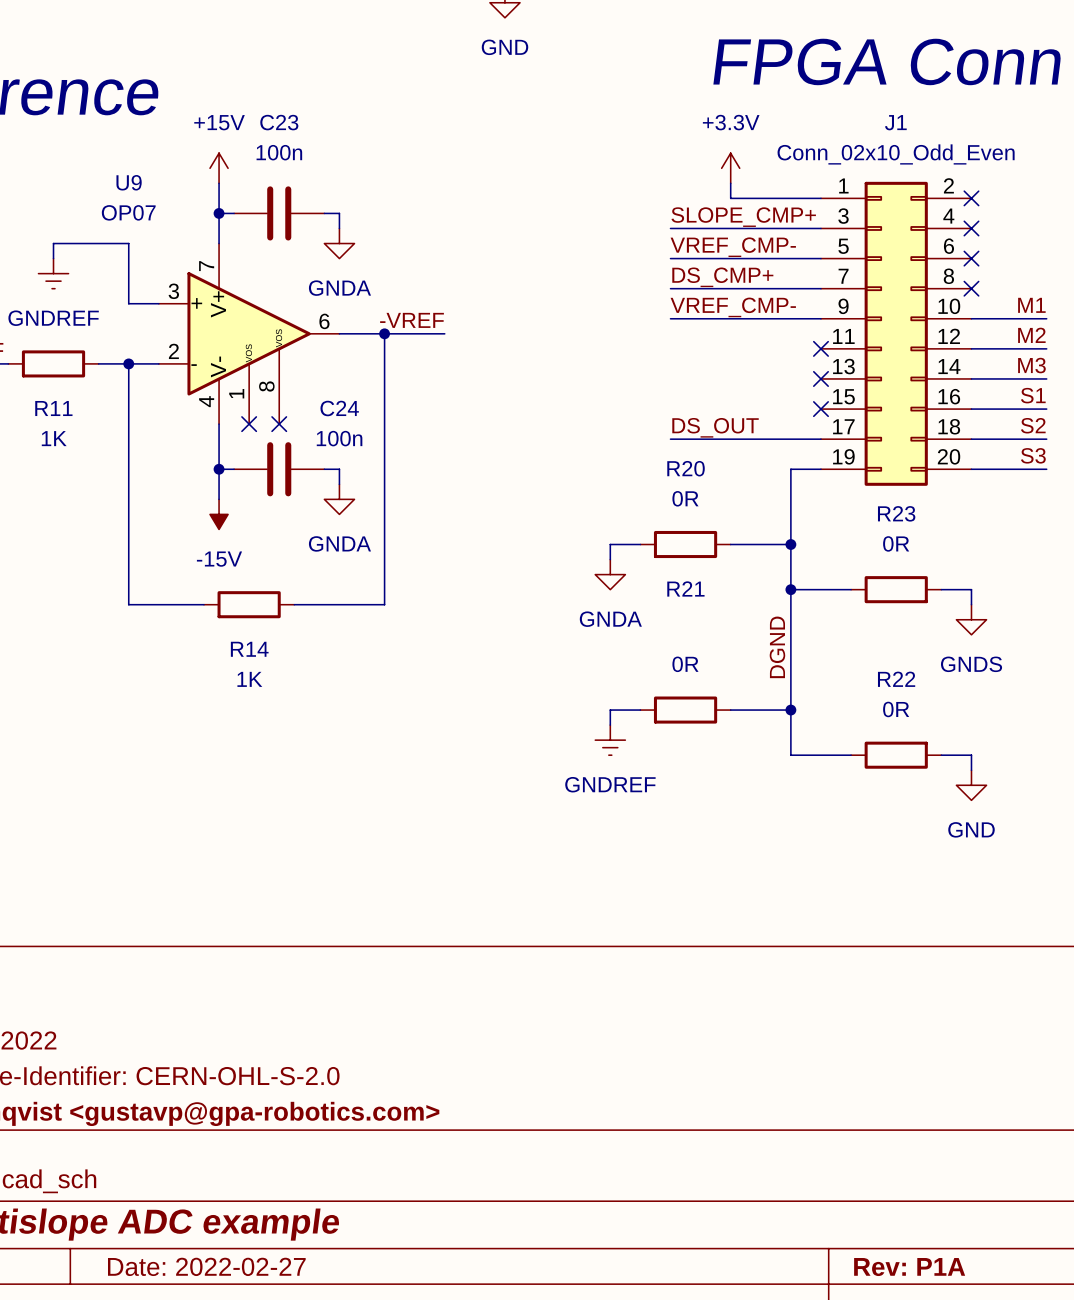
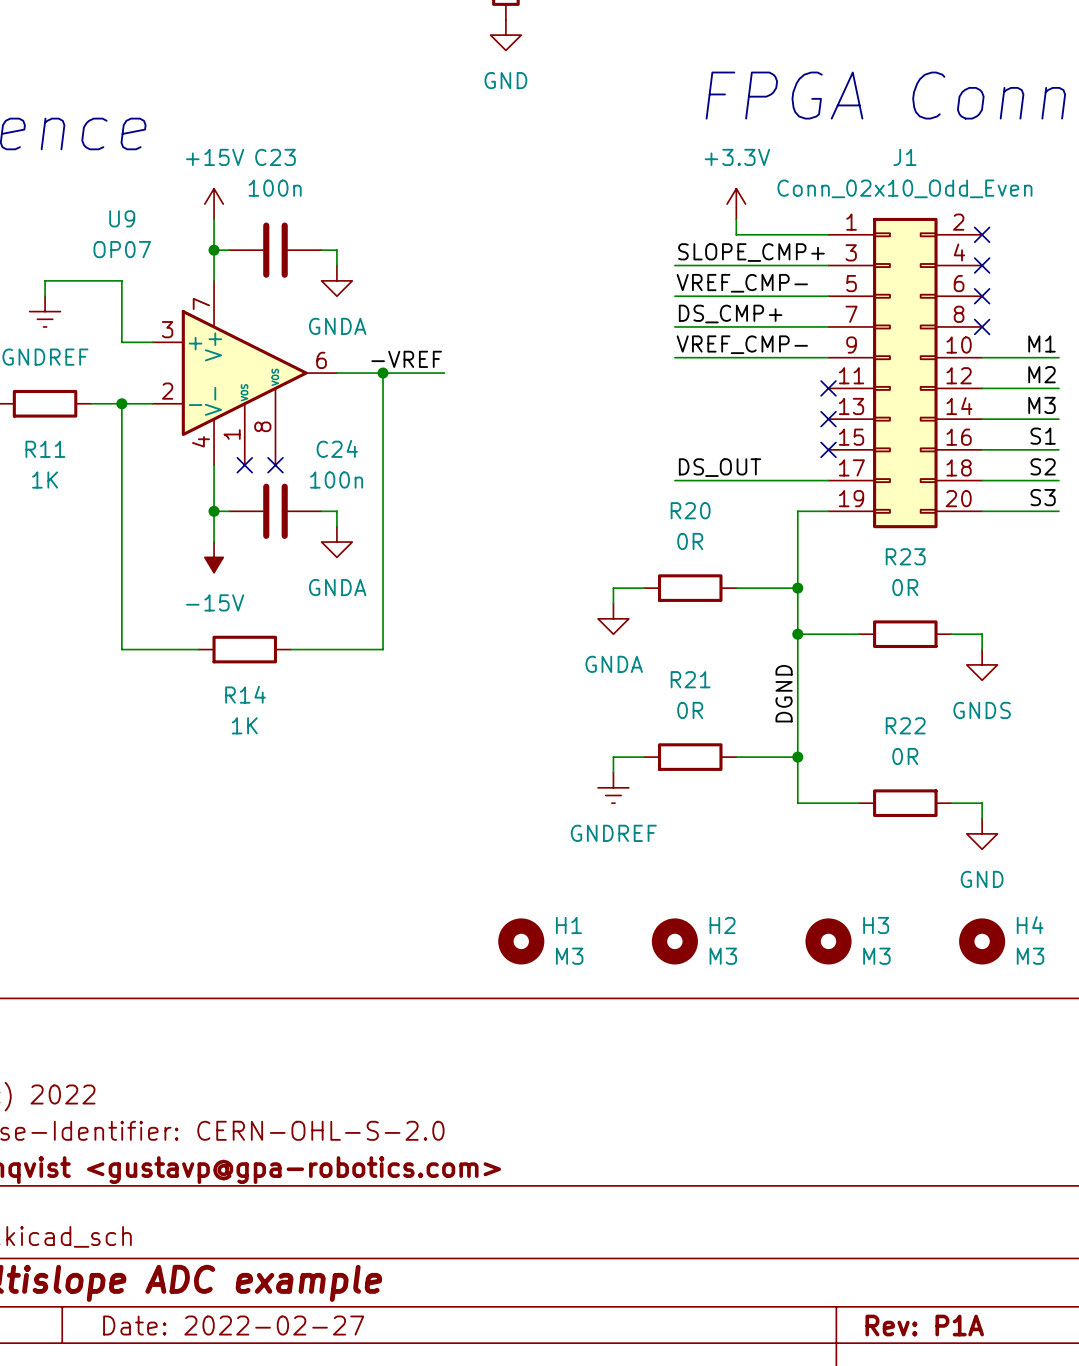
R21 name position: R21 (685, 588) -> R21 (690, 679)
H1: none -> M3 (521, 941)
H2: none -> M3 (674, 941)
H3: none -> M3 (828, 941)
H4: none -> M3 (982, 941)

